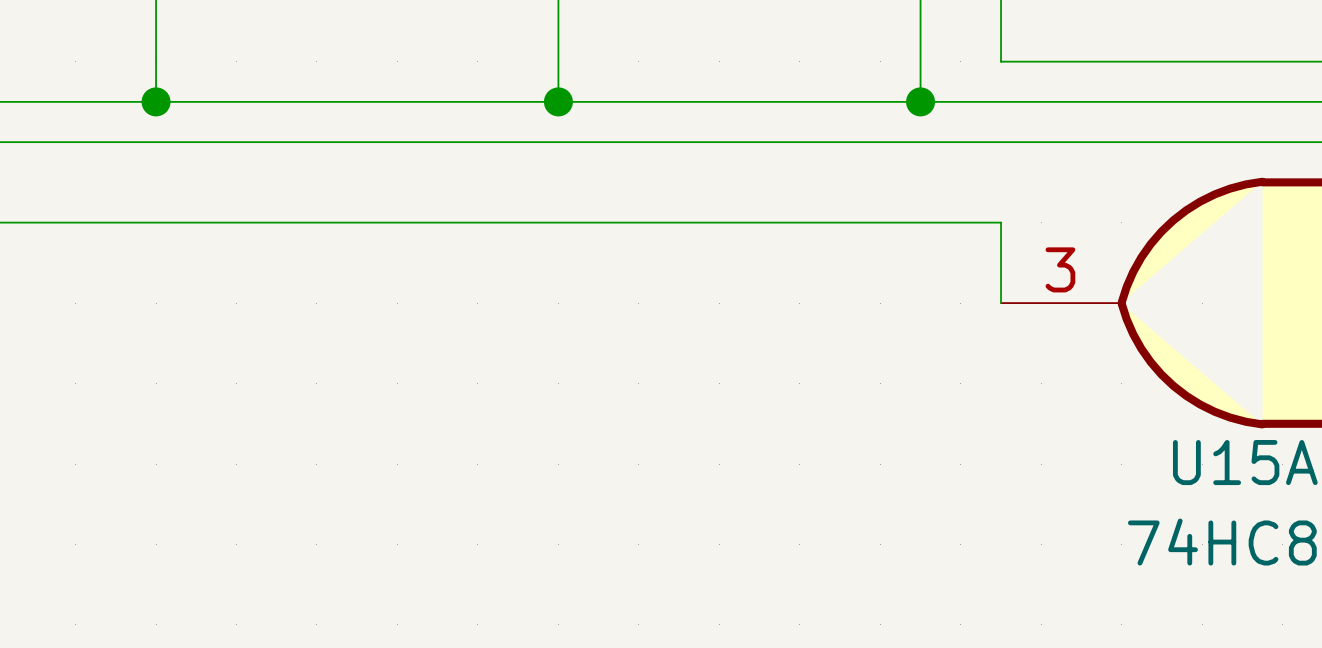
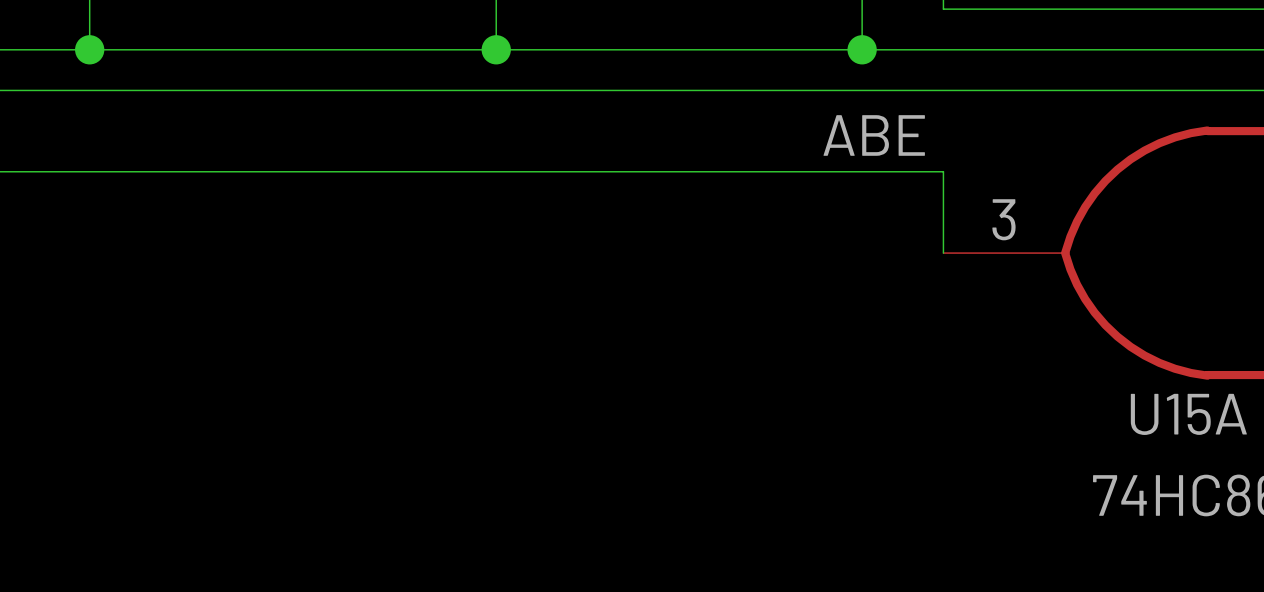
label: none -> ABE (874, 135)

